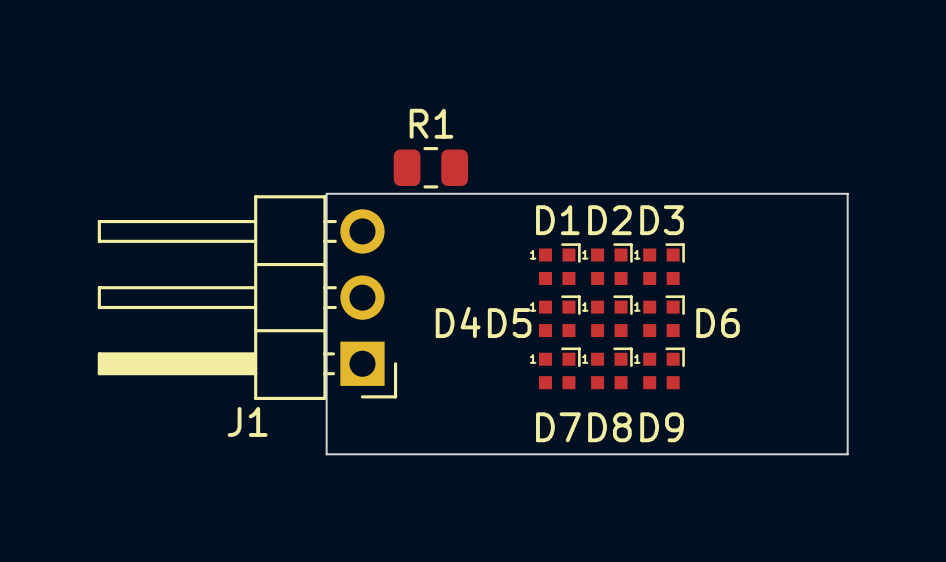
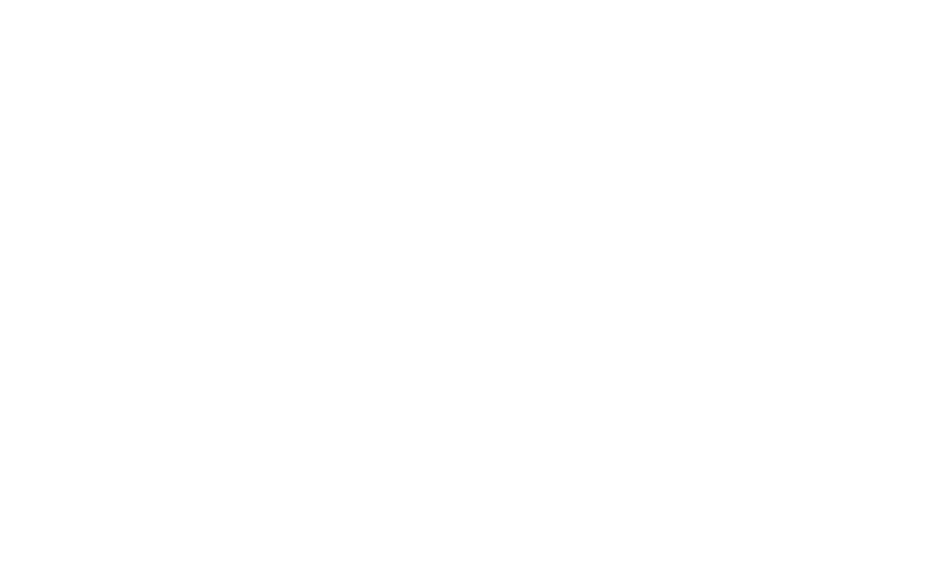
R1: (430, 167) -> none
board edge: (326, 193) (847, 193) (847, 454) (326, 454) (326, 193) -> none
D1: (559, 264) -> none
D2: (611, 264) -> none
D3: (664, 264) -> none
J1: (247, 297) -> none
D4: (559, 316) -> none
D5: (611, 316) -> none
D6: (664, 316) -> none
D7: (559, 368) -> none
D8: (611, 368) -> none
D9: (664, 368) -> none

